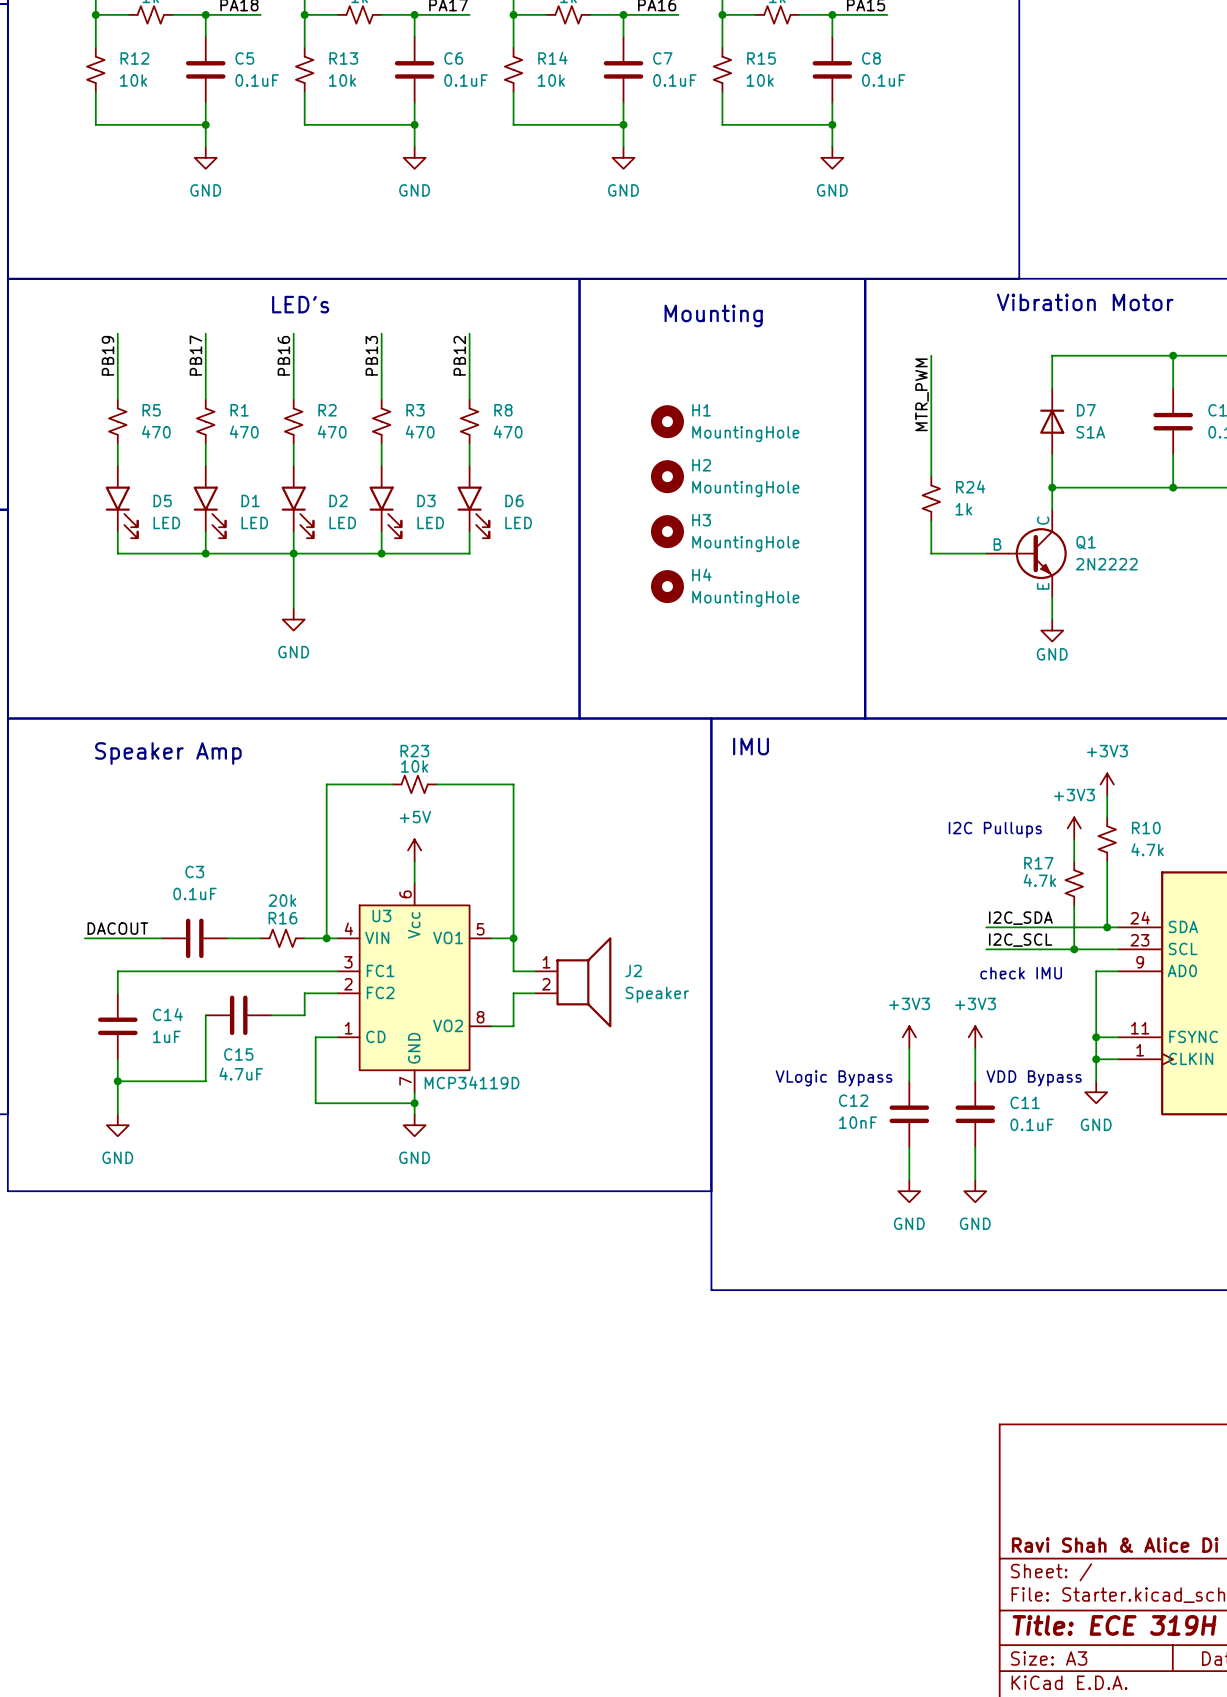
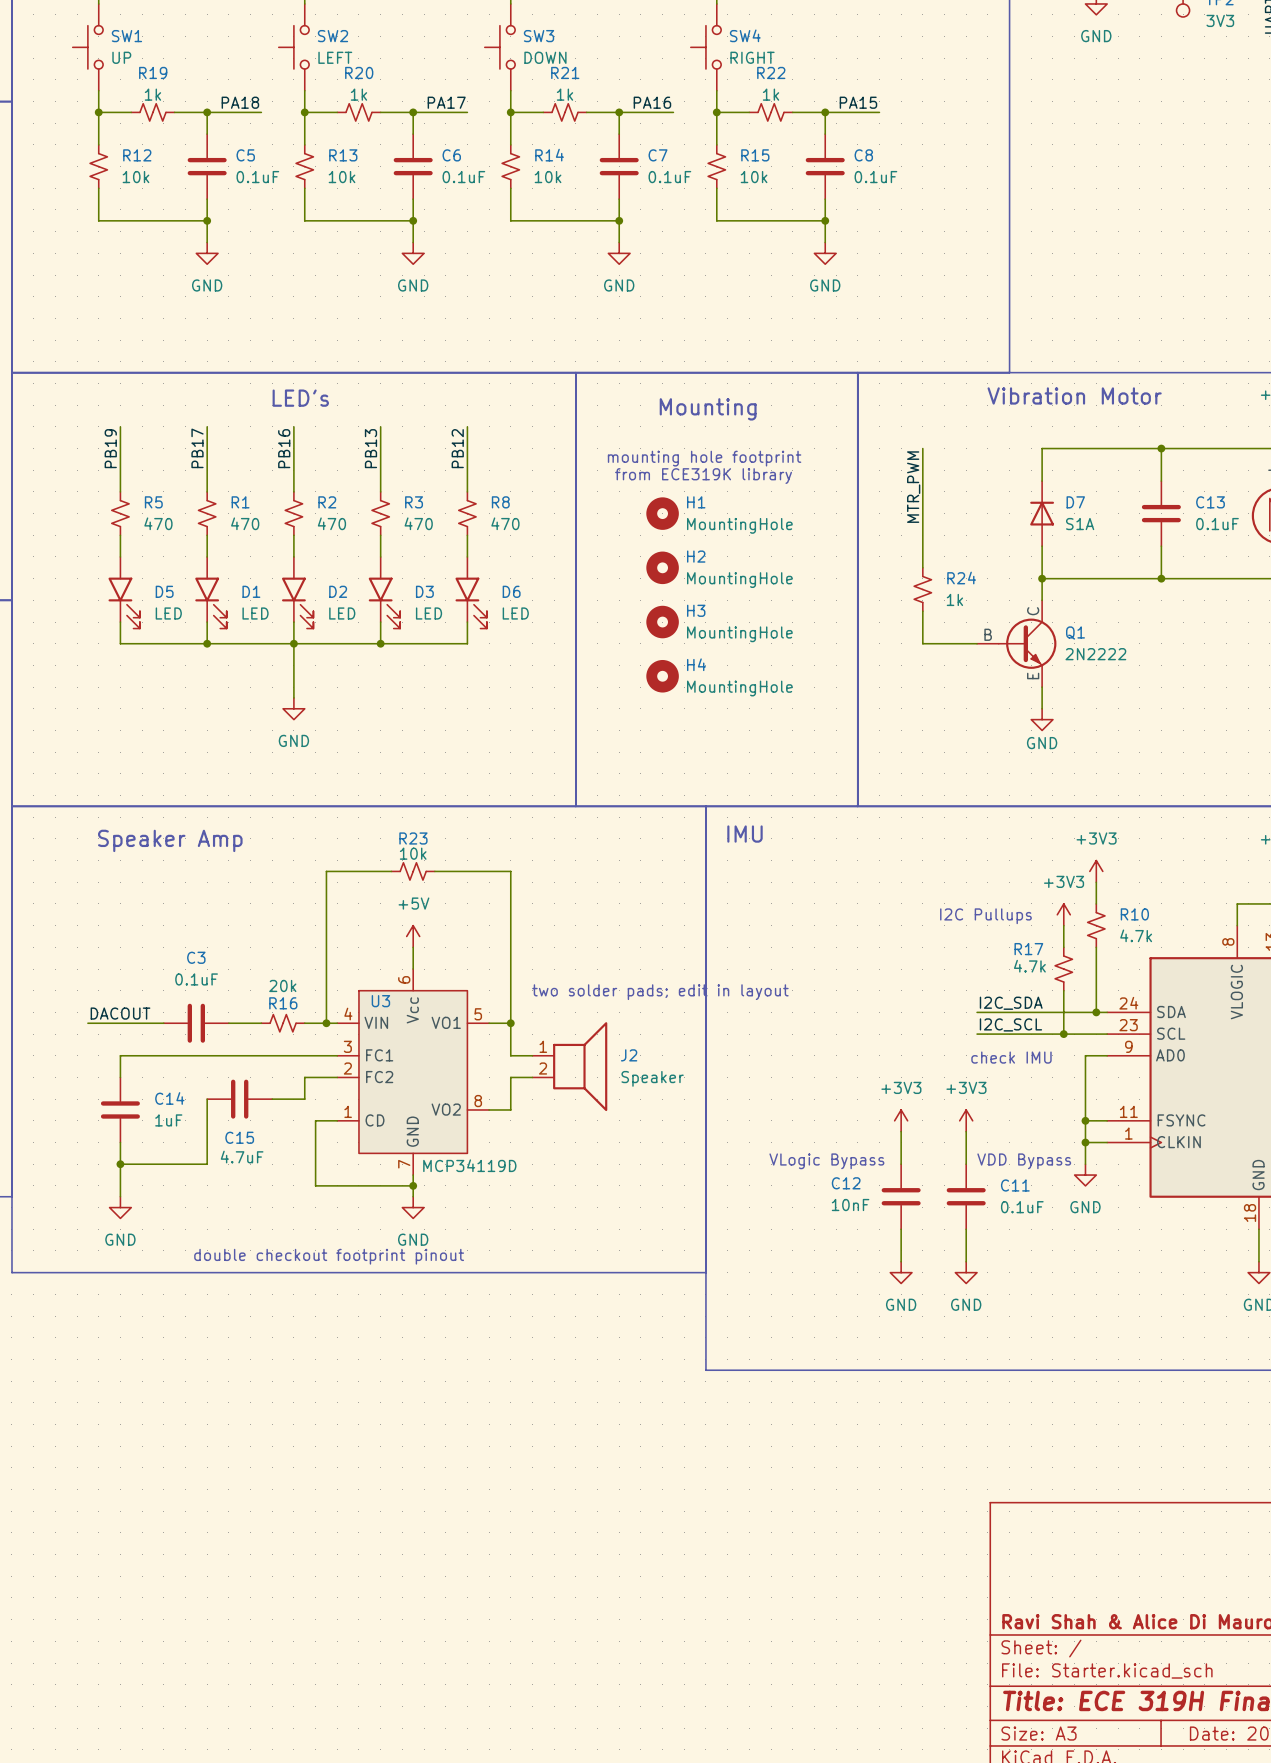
text: none -> mounting hole footprint (704, 458)
text: none -> from ECE319K library (703, 476)
text: none -> two solder pads; edit in layout (660, 992)
text: none -> double checkout footprint pinout (329, 1256)

